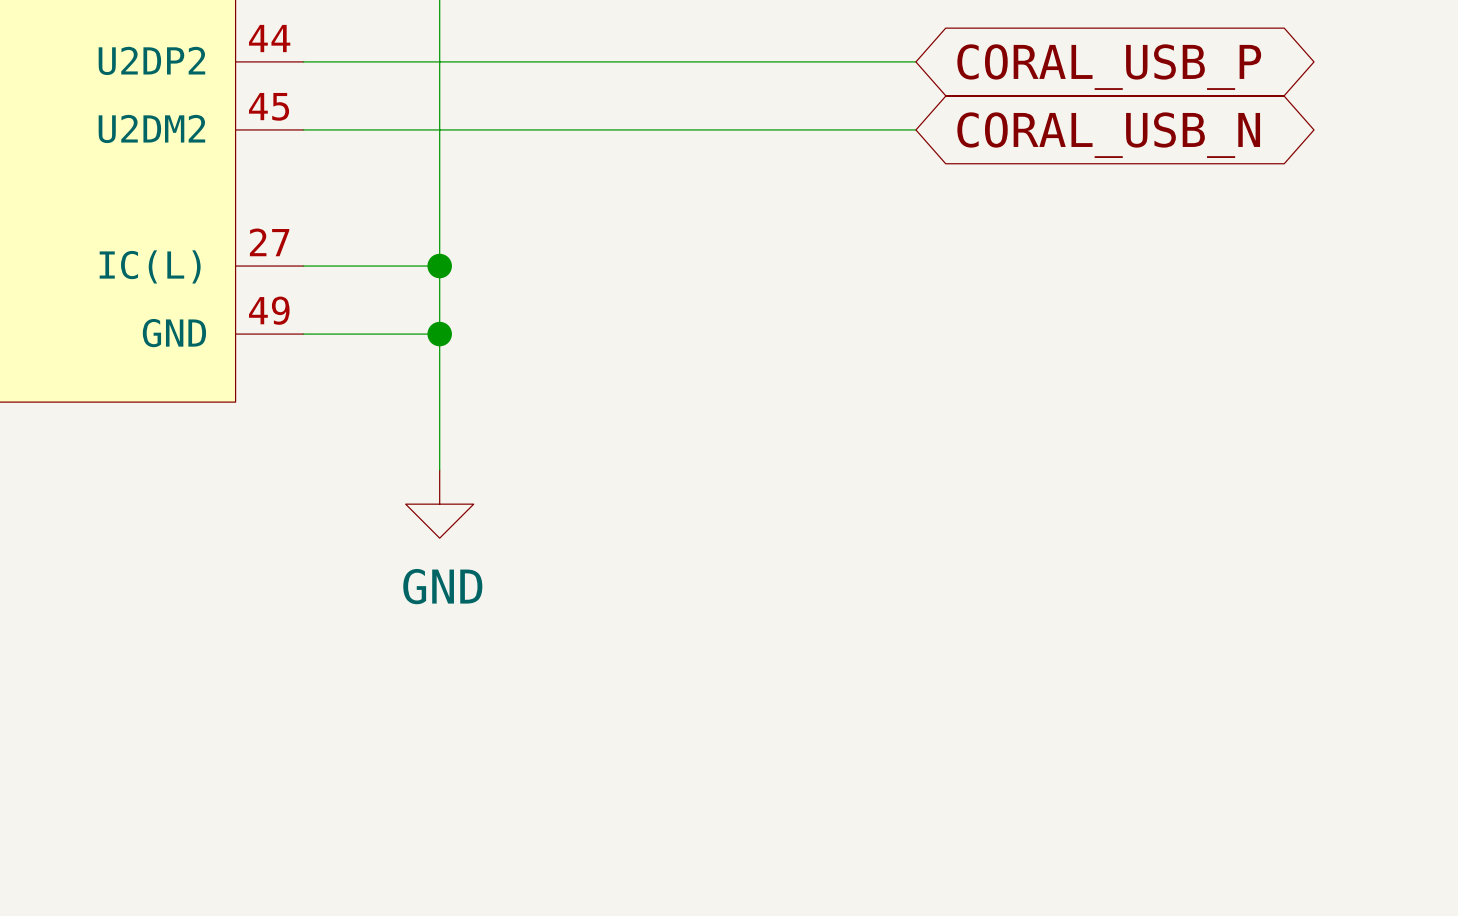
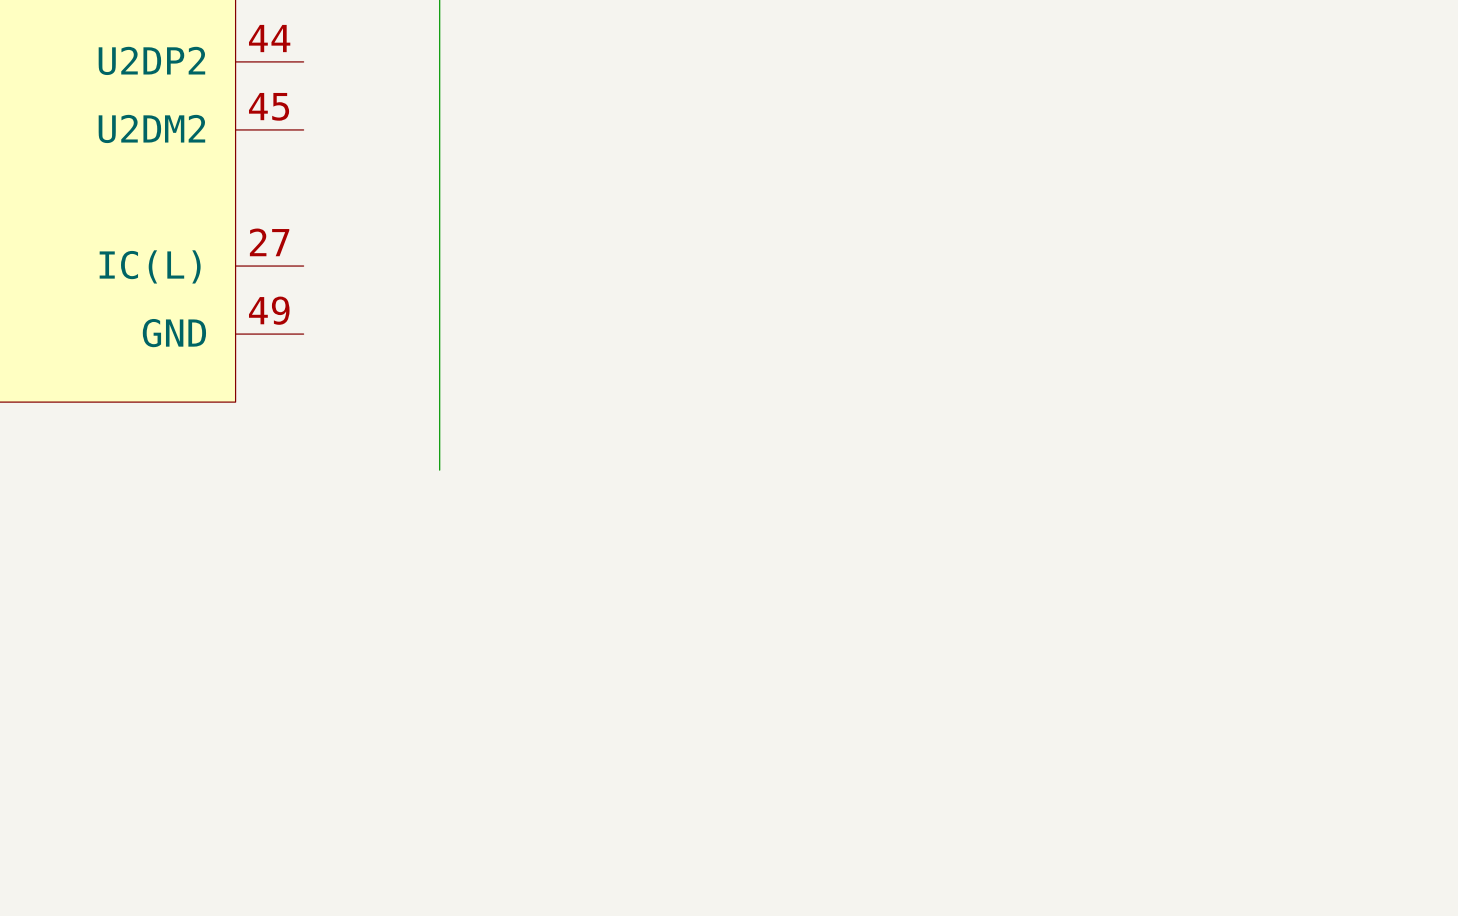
wire: (303, 61) (915, 61) -> none
global label: CORAL_USB_P (1109, 67) -> none
wire: (303, 129) (915, 129) -> none
global label: CORAL_USB_N (1108, 135) -> none
wire: (303, 266) (439, 266) -> none
junction: (439, 266) -> none
wire: (303, 334) (439, 334) -> none
junction: (439, 334) -> none
power symbol: GND (439, 504) -> none

